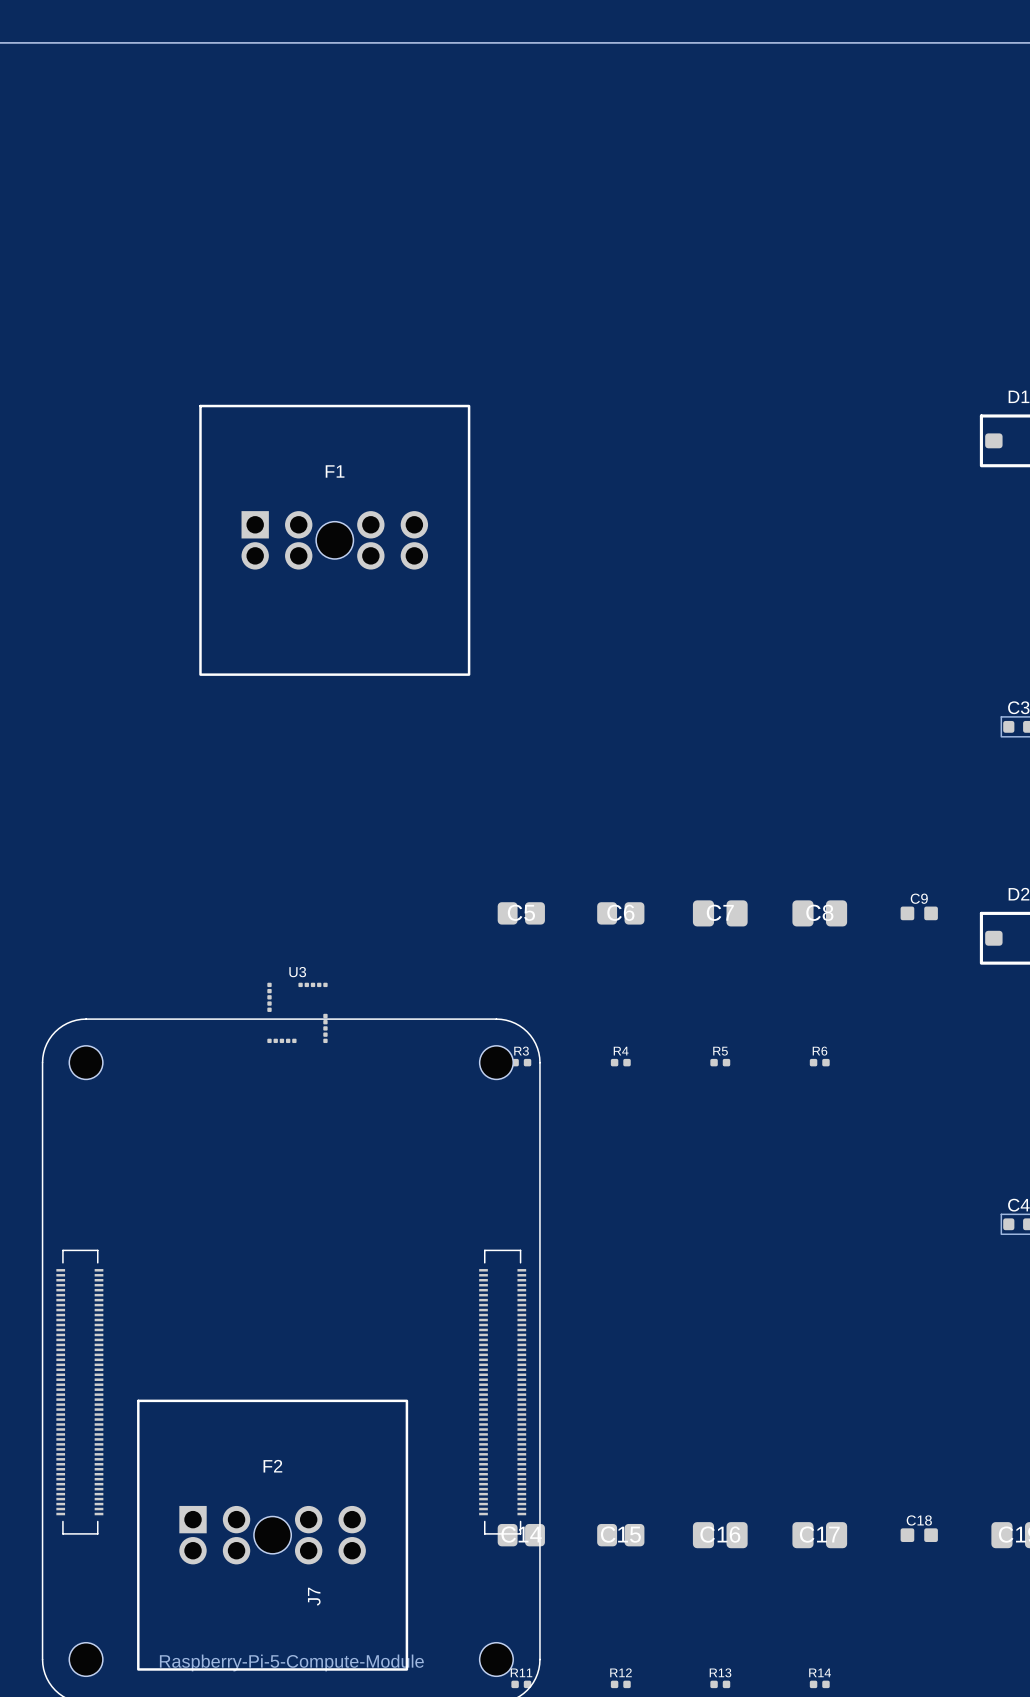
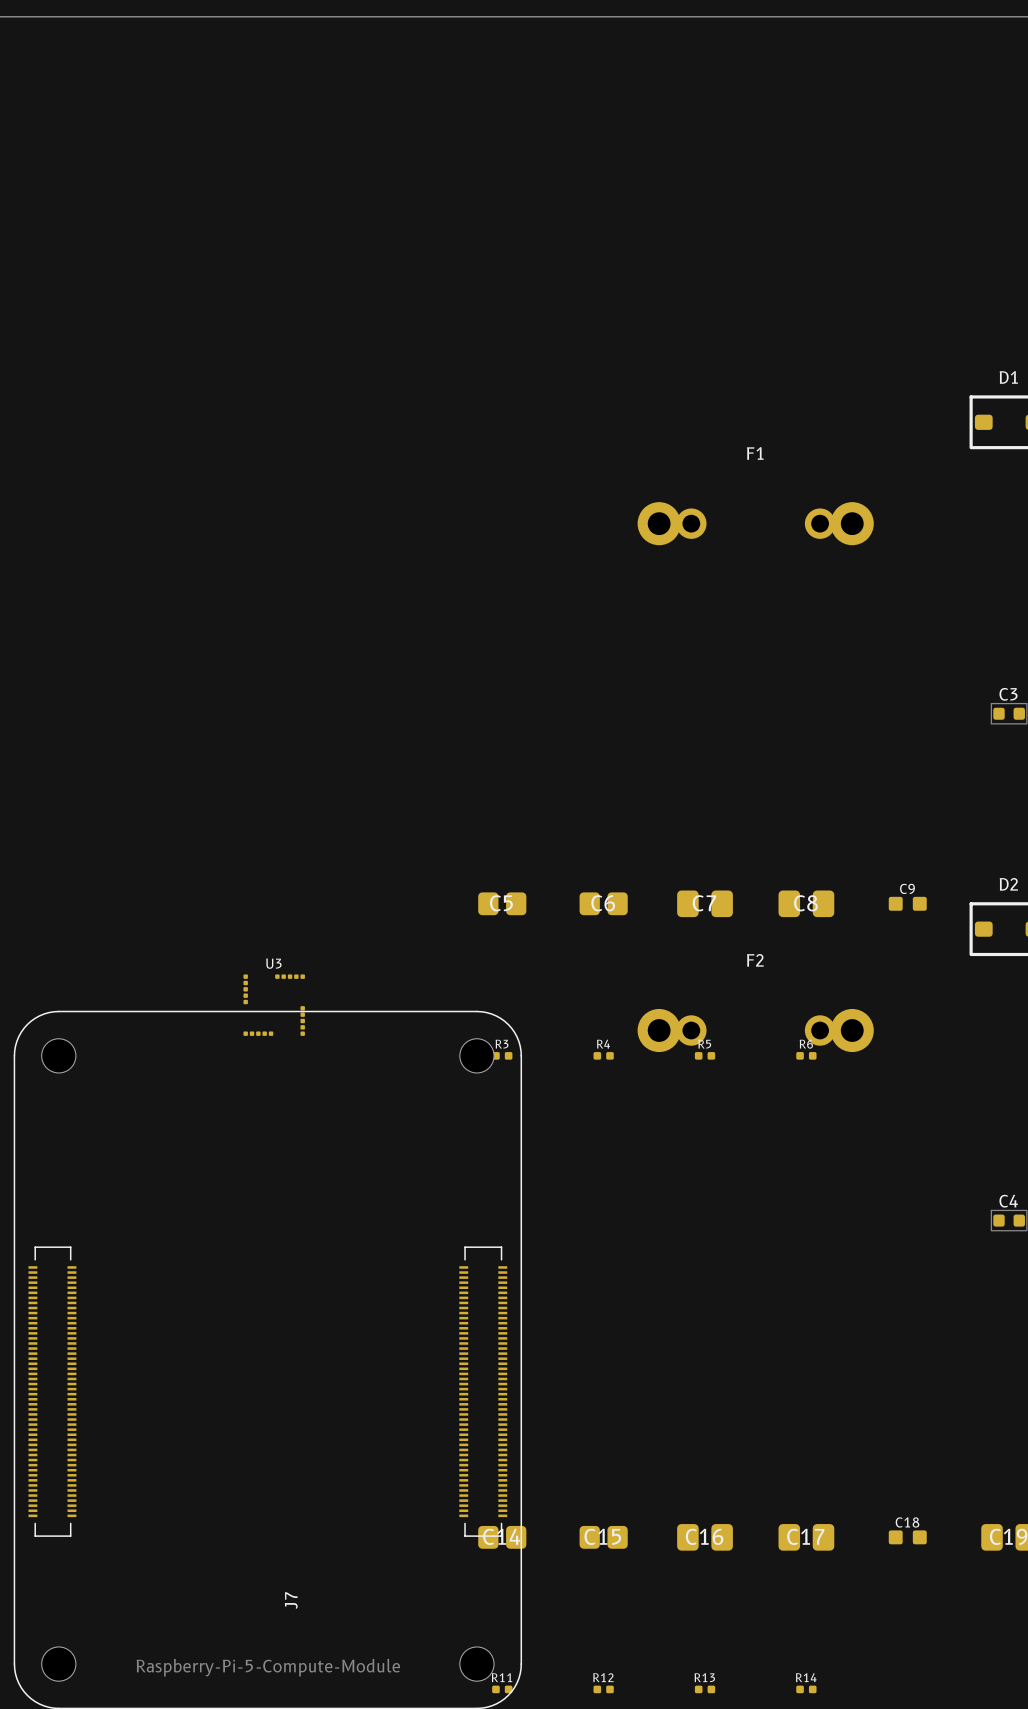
F1 footprint: [199, 404, 471, 676] -> [637, 502, 874, 546]
F2 footprint: [137, 1399, 409, 1671] -> [637, 1008, 874, 1053]

